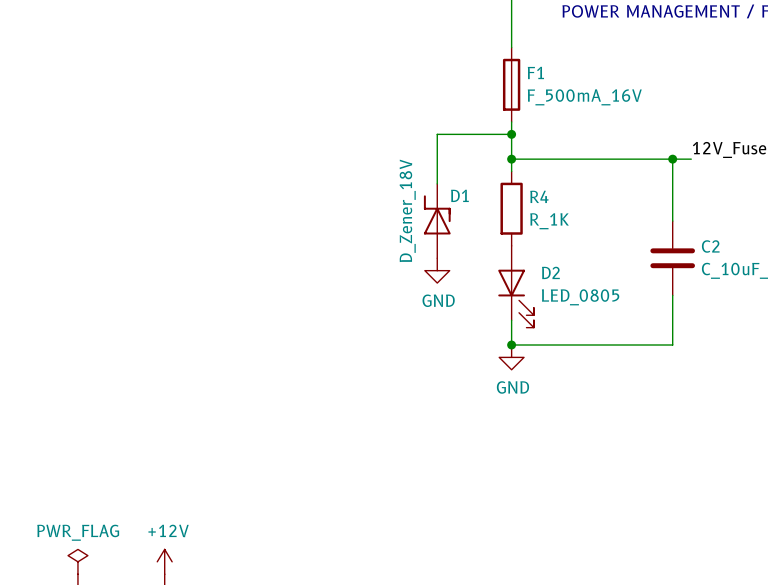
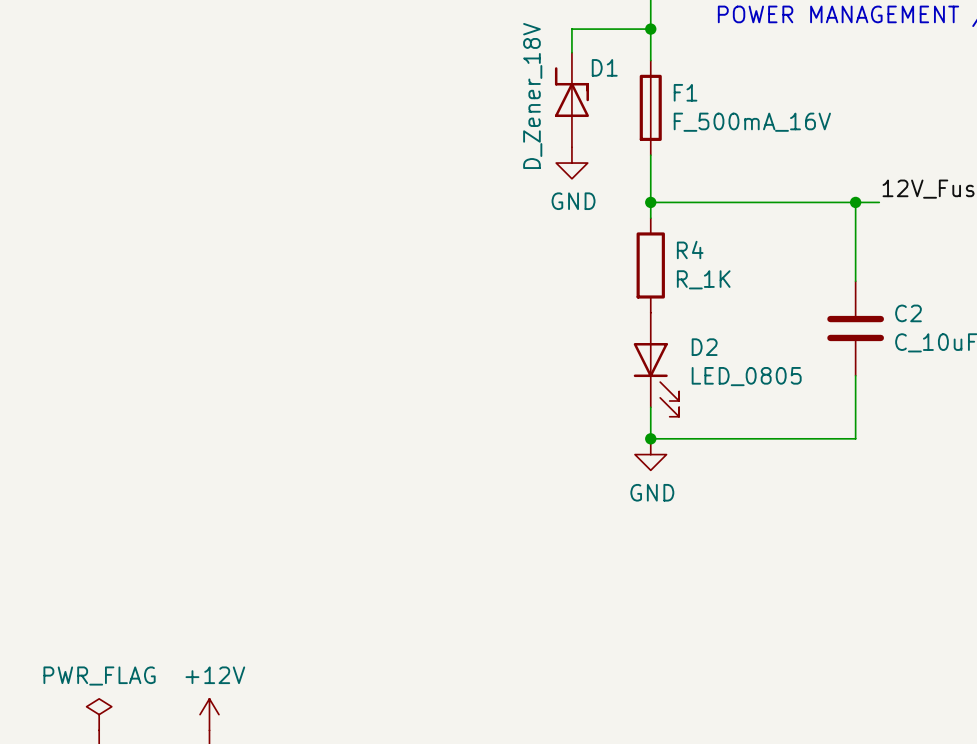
wire: none -> (650, 29) (571, 29) (571, 52)
junction: none -> (650, 29)
wire: (511, 134) (437, 134) (437, 183) -> none
junction: (511, 134) -> none
D1 position: (437, 221) -> (571, 99)
power symbol position: GND (437, 270) -> GND (571, 163)

